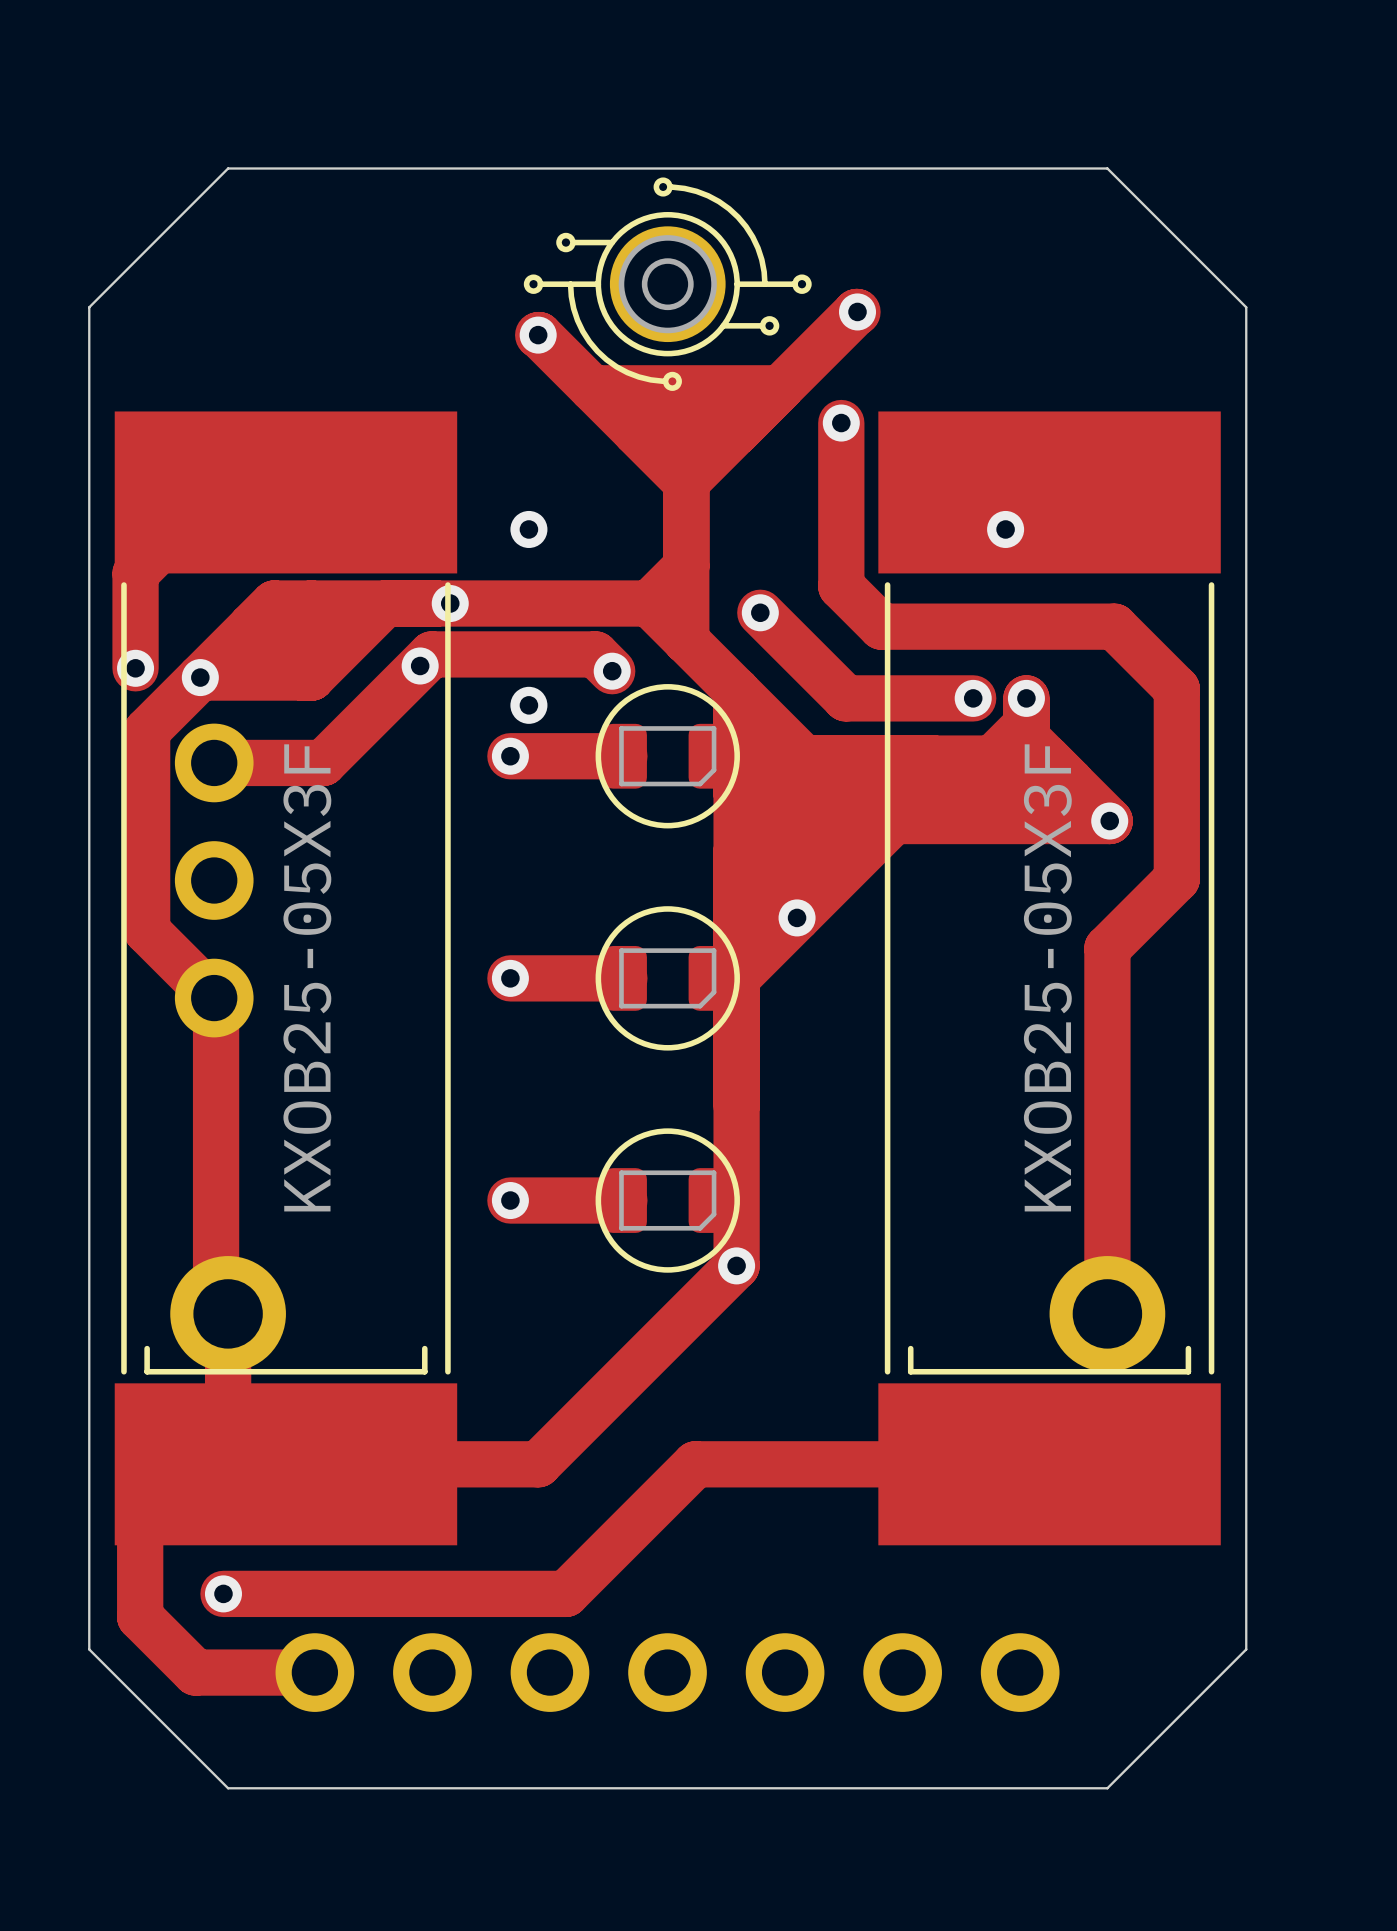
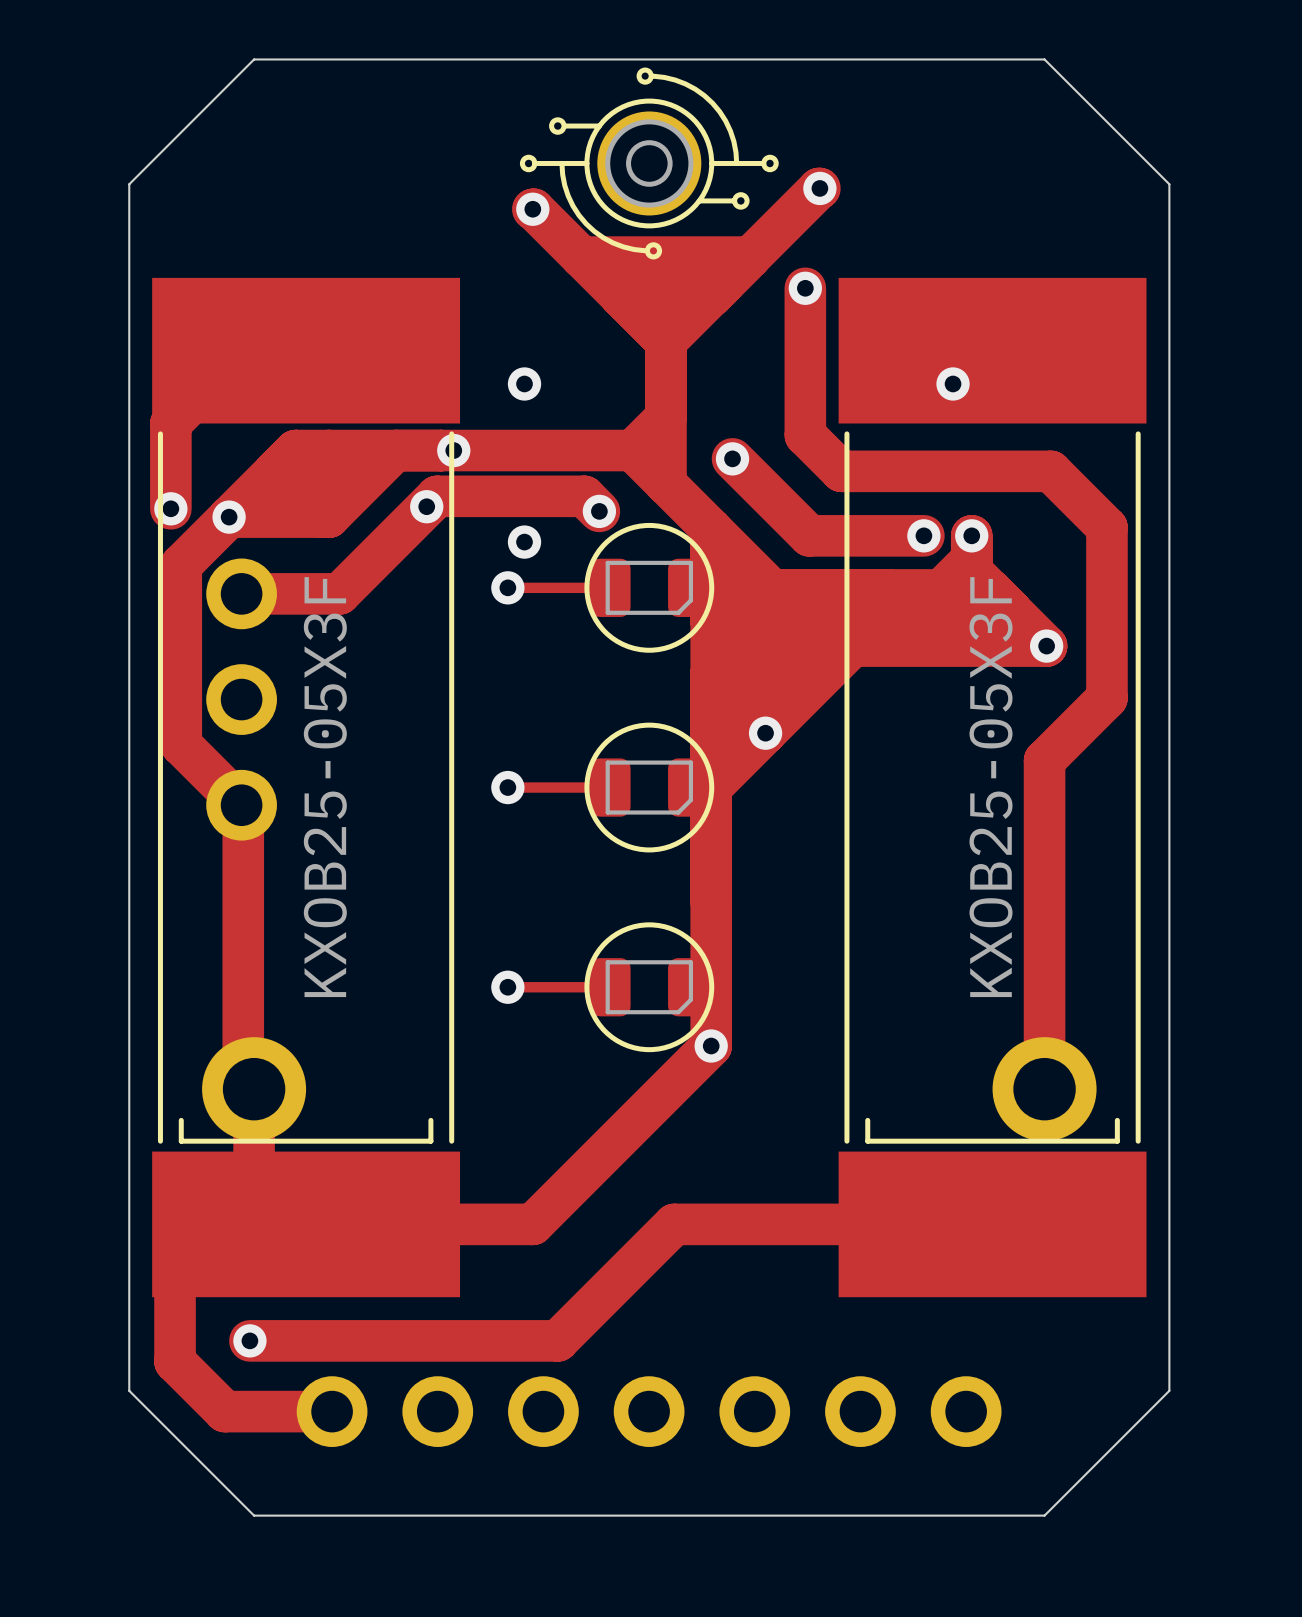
track width: thick (510, 756) (624, 756) -> thin (507, 587) (610, 587)
track width: thick (510, 978) (624, 978) -> thin (507, 787) (610, 787)
track width: thick (510, 1200) (624, 1200) -> thin (507, 987) (610, 987)

